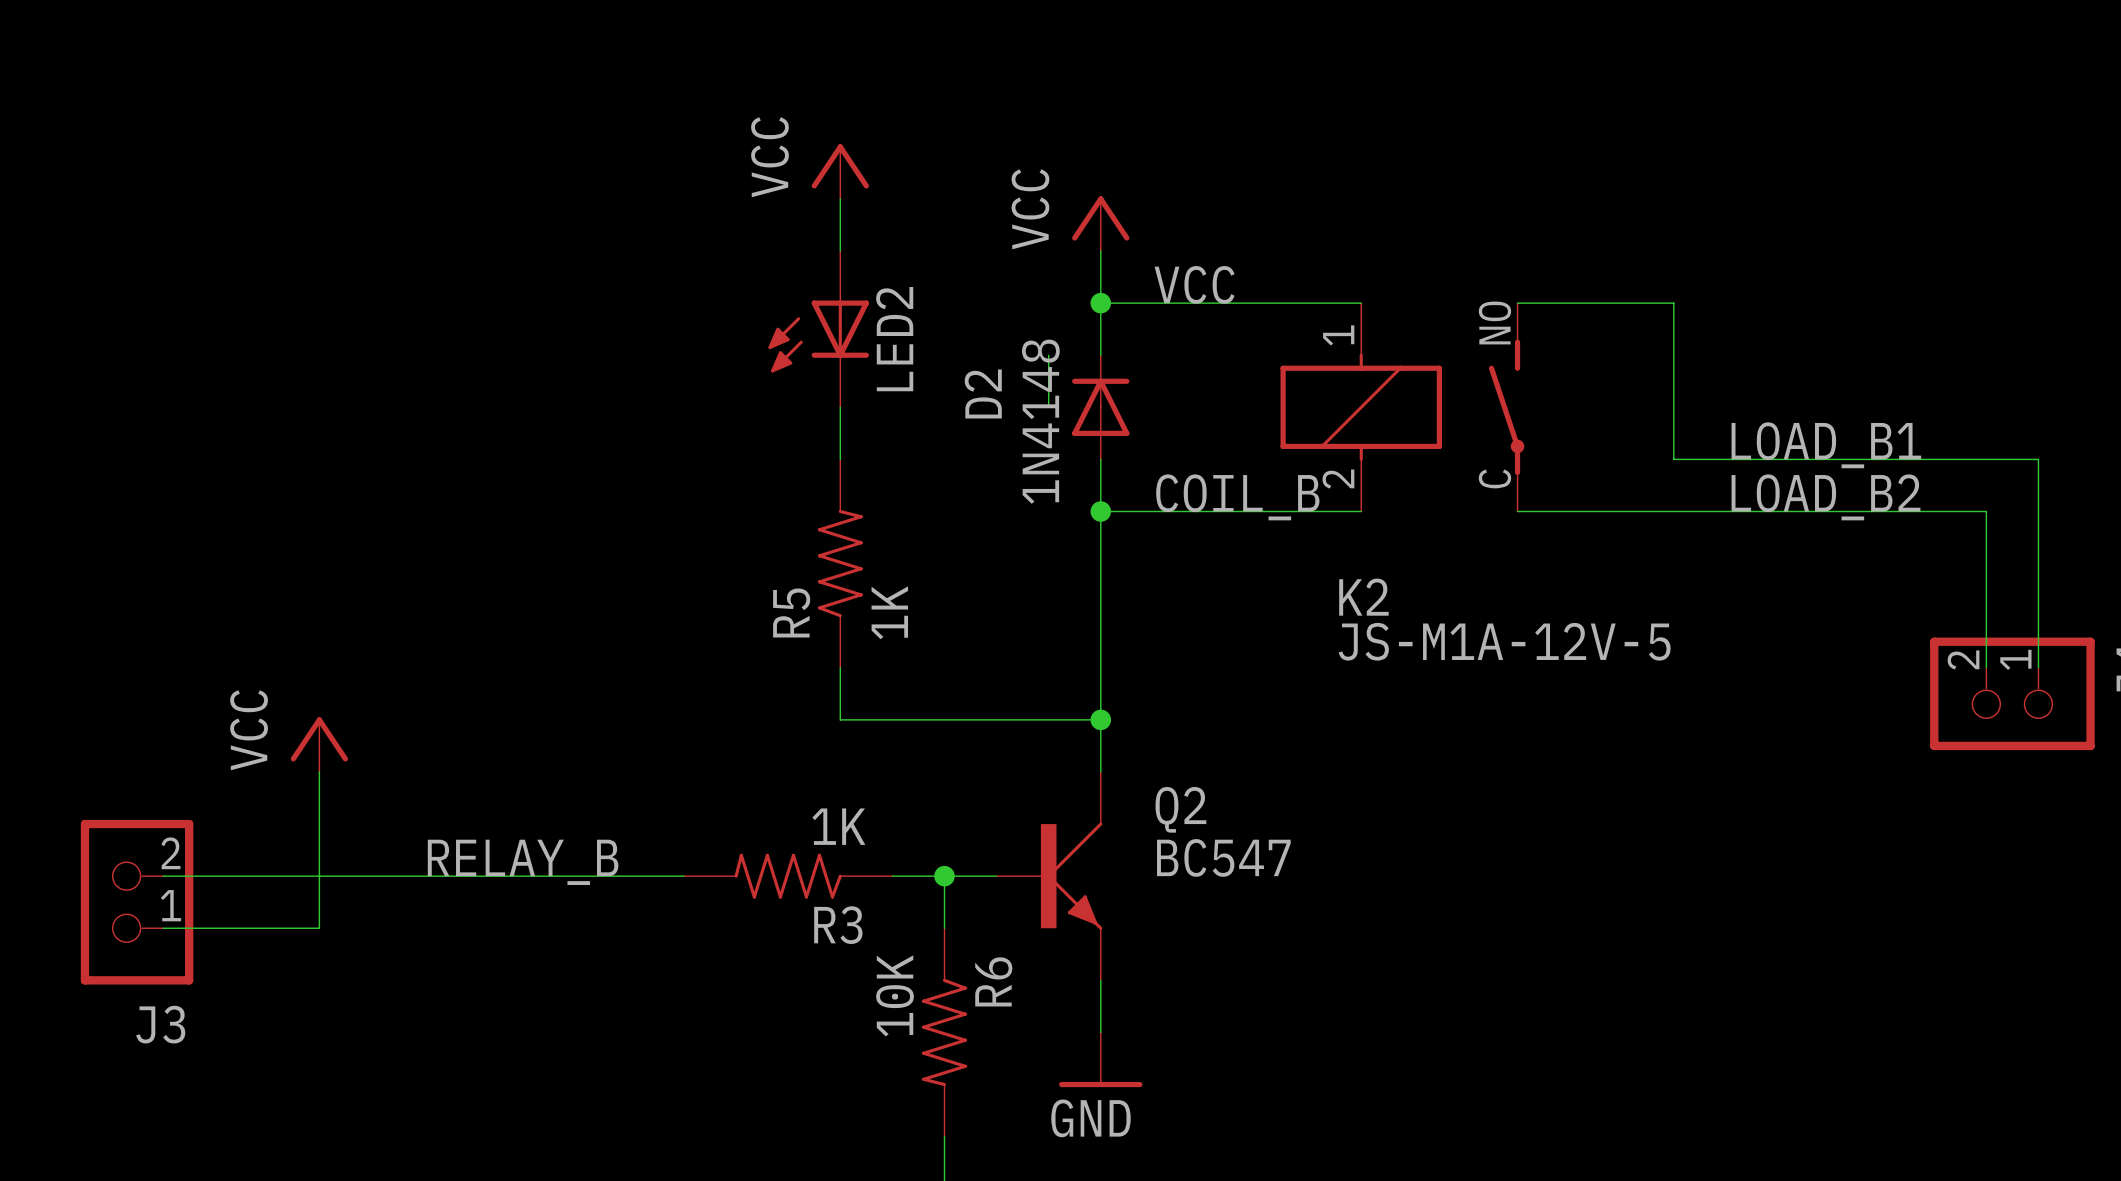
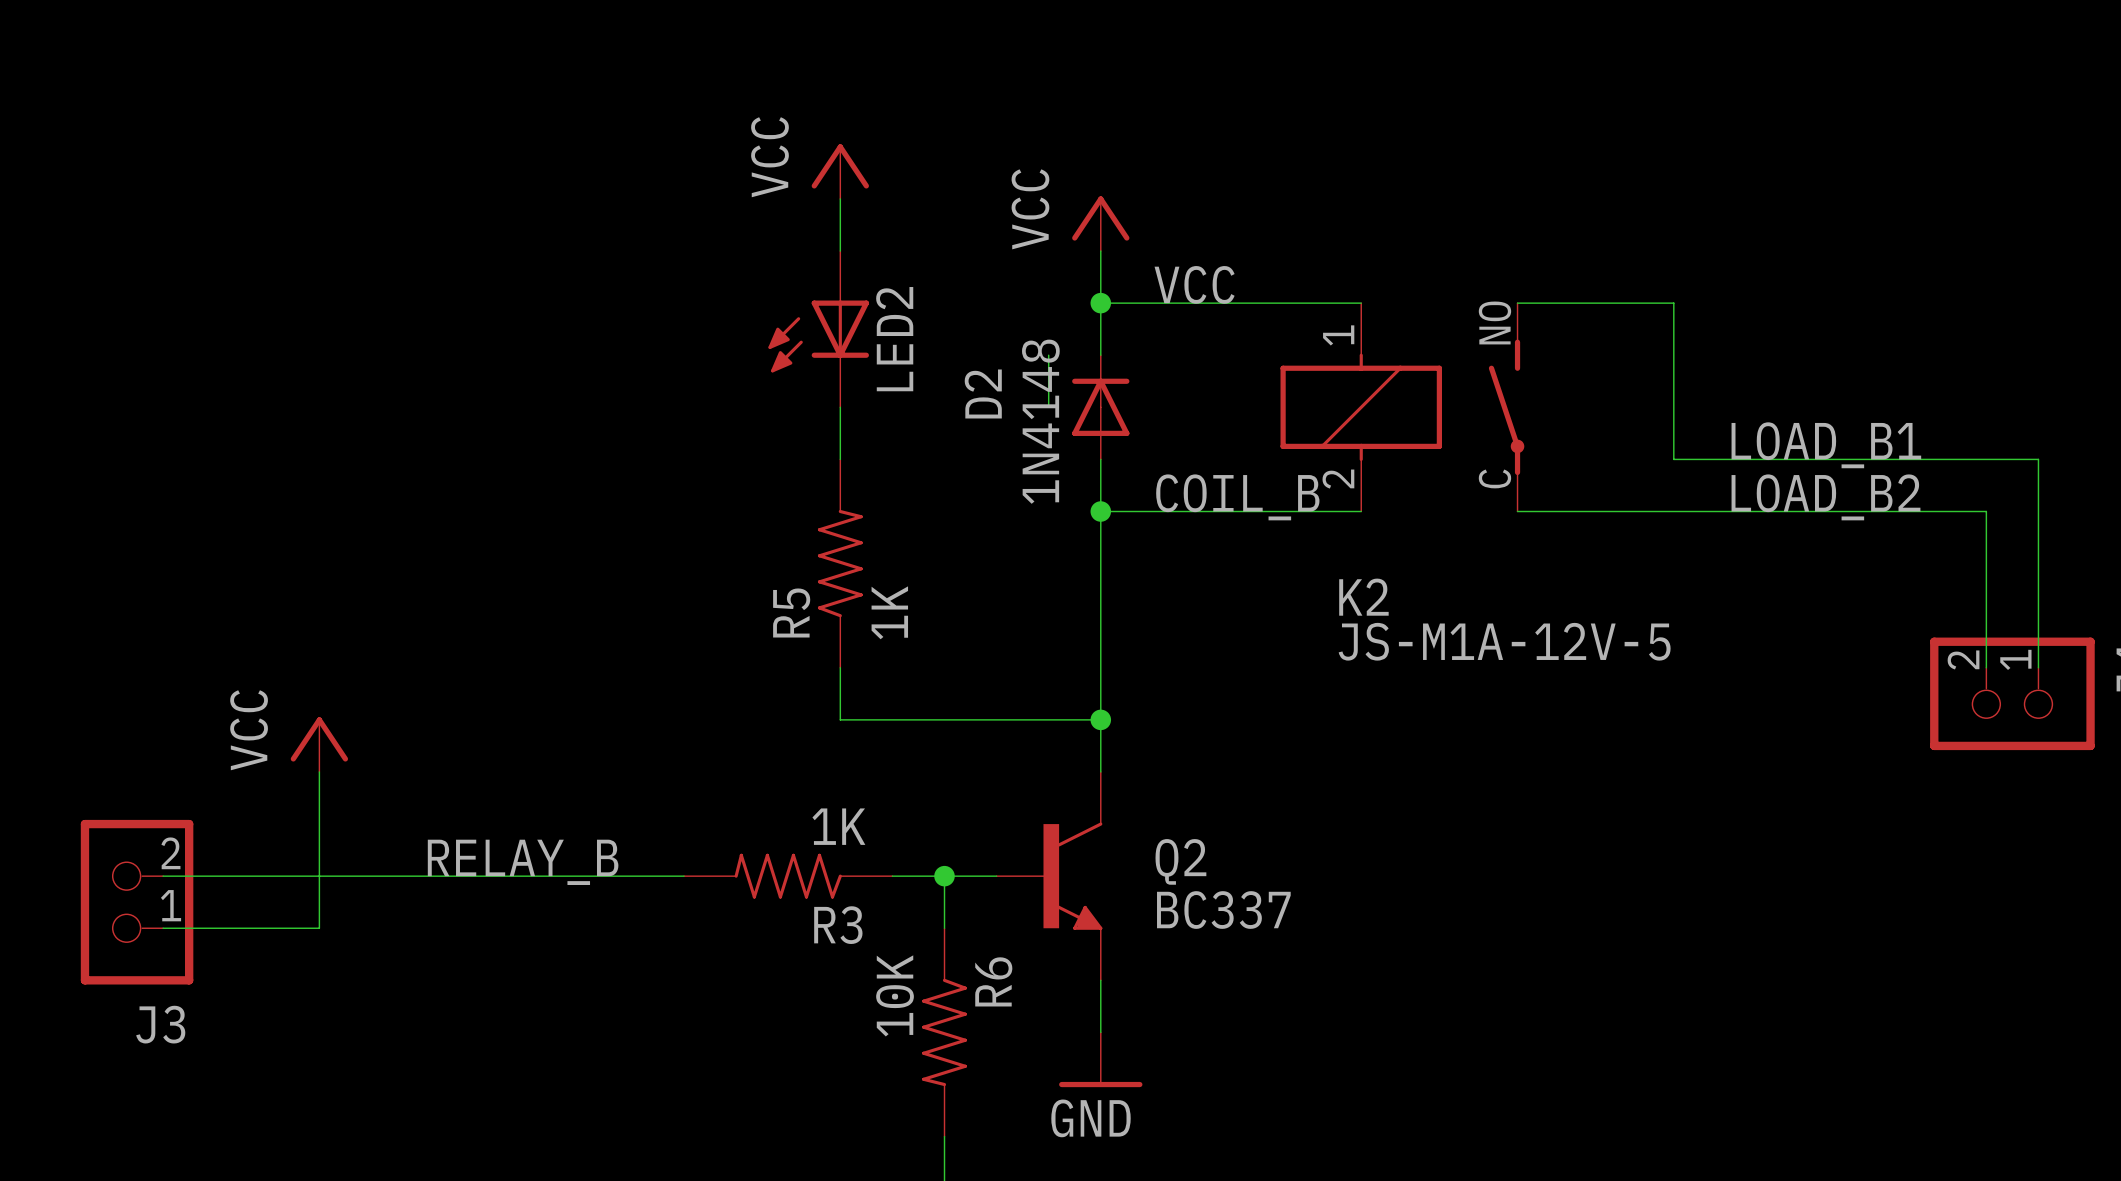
Q2 symbol: [996, 771, 1103, 981] -> [996, 771, 1103, 981]
Q2 name position: Q2 (1180, 809) -> Q2 (1180, 861)
Q2 value: BC547 (1223, 857) -> BC337 (1223, 910)

